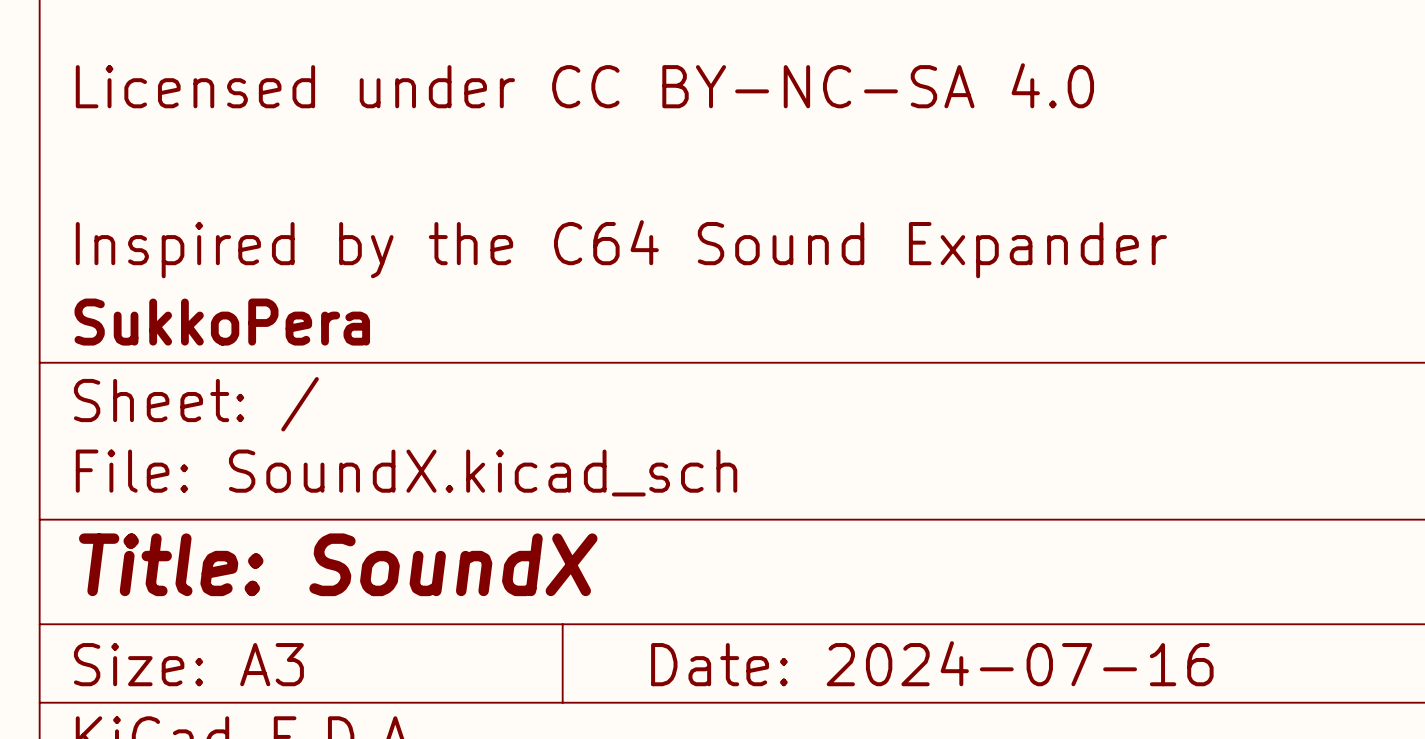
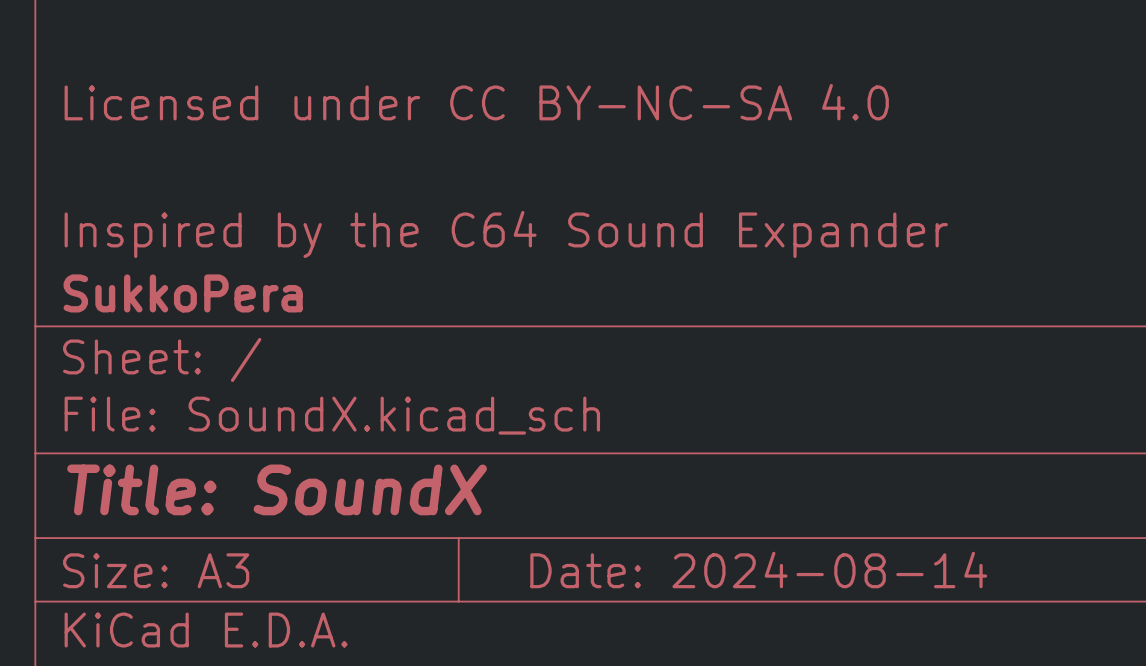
title block: Date: 2024-07-16 (932, 663) -> Date: 2024-08-14 (758, 570)

